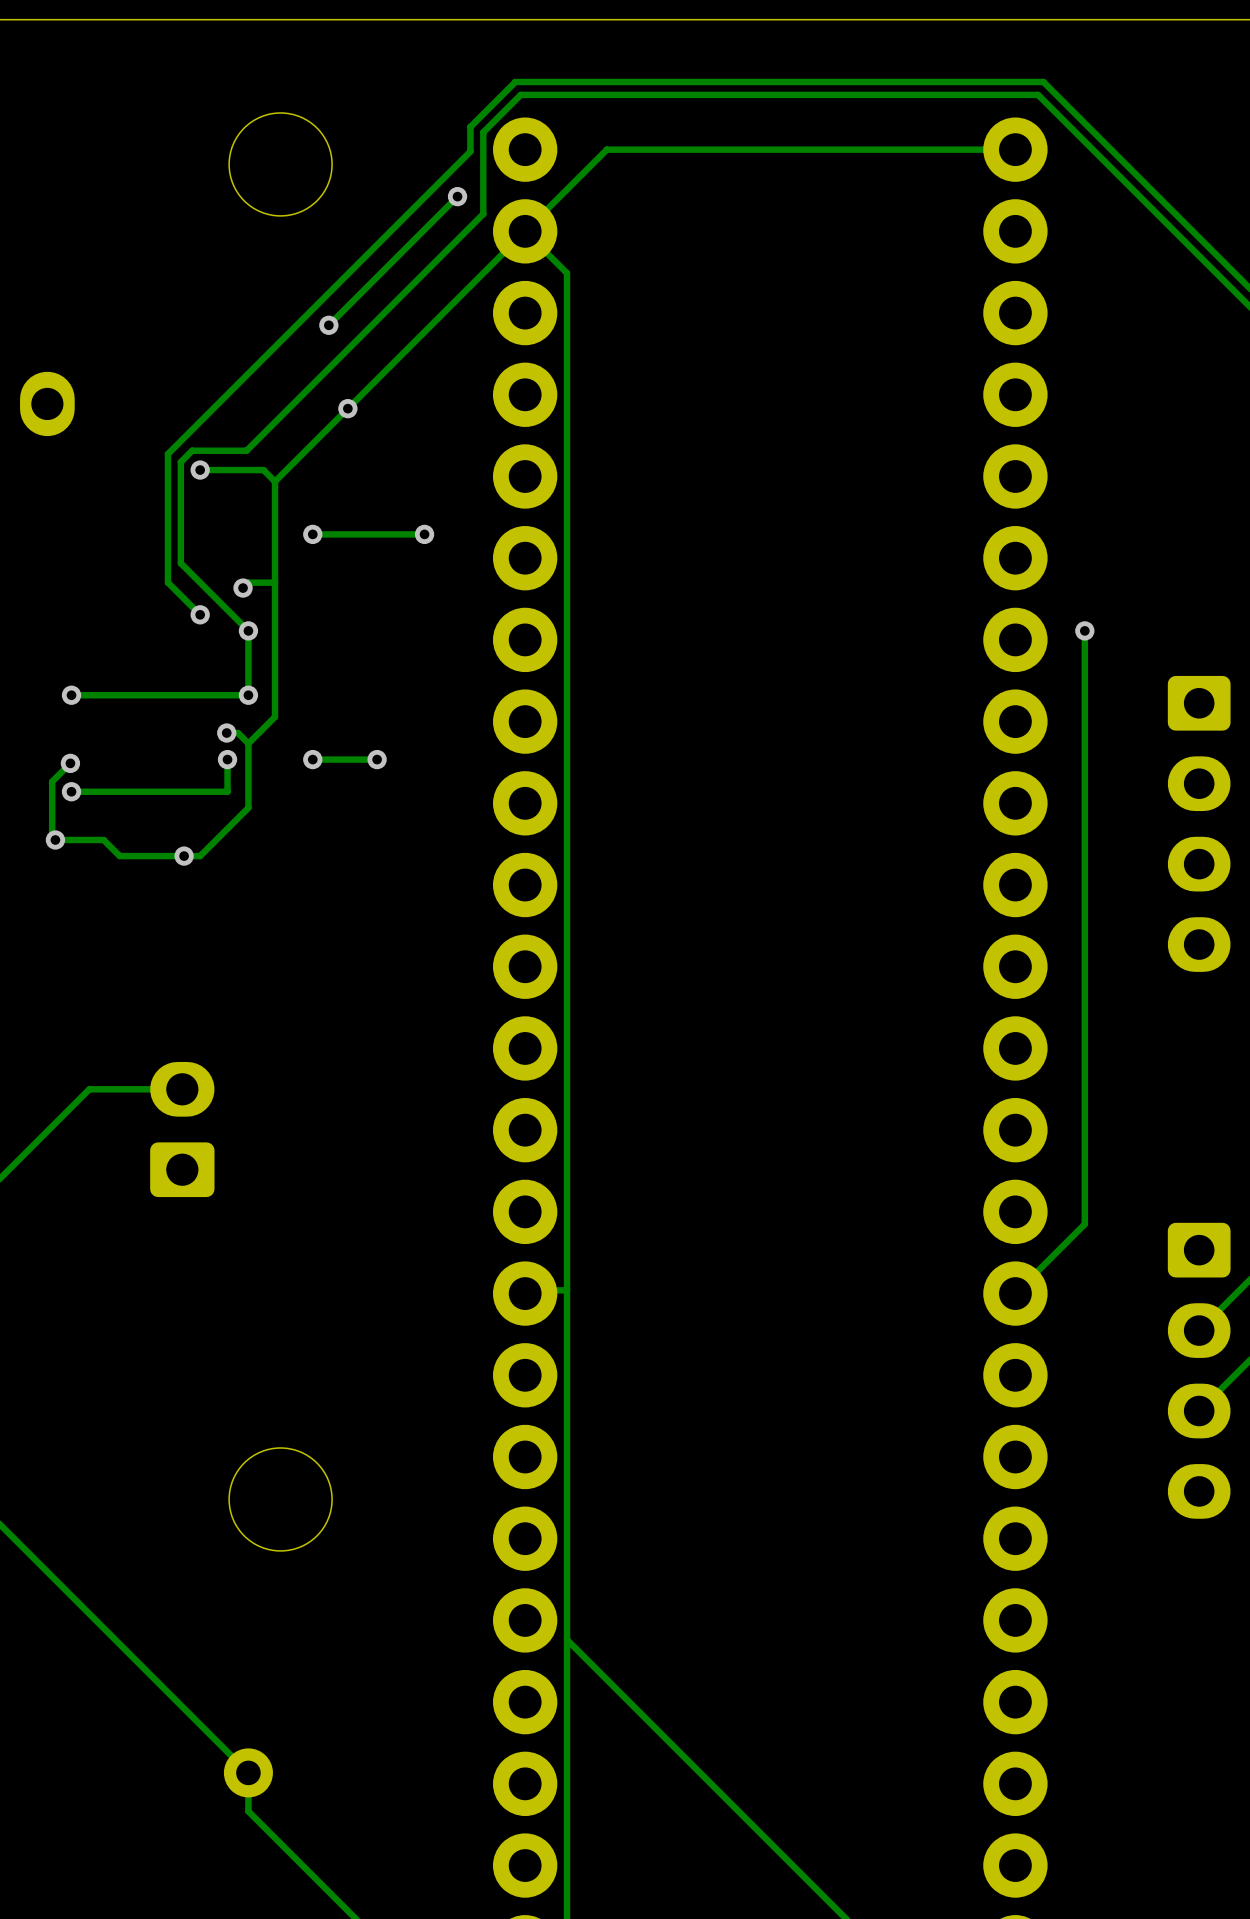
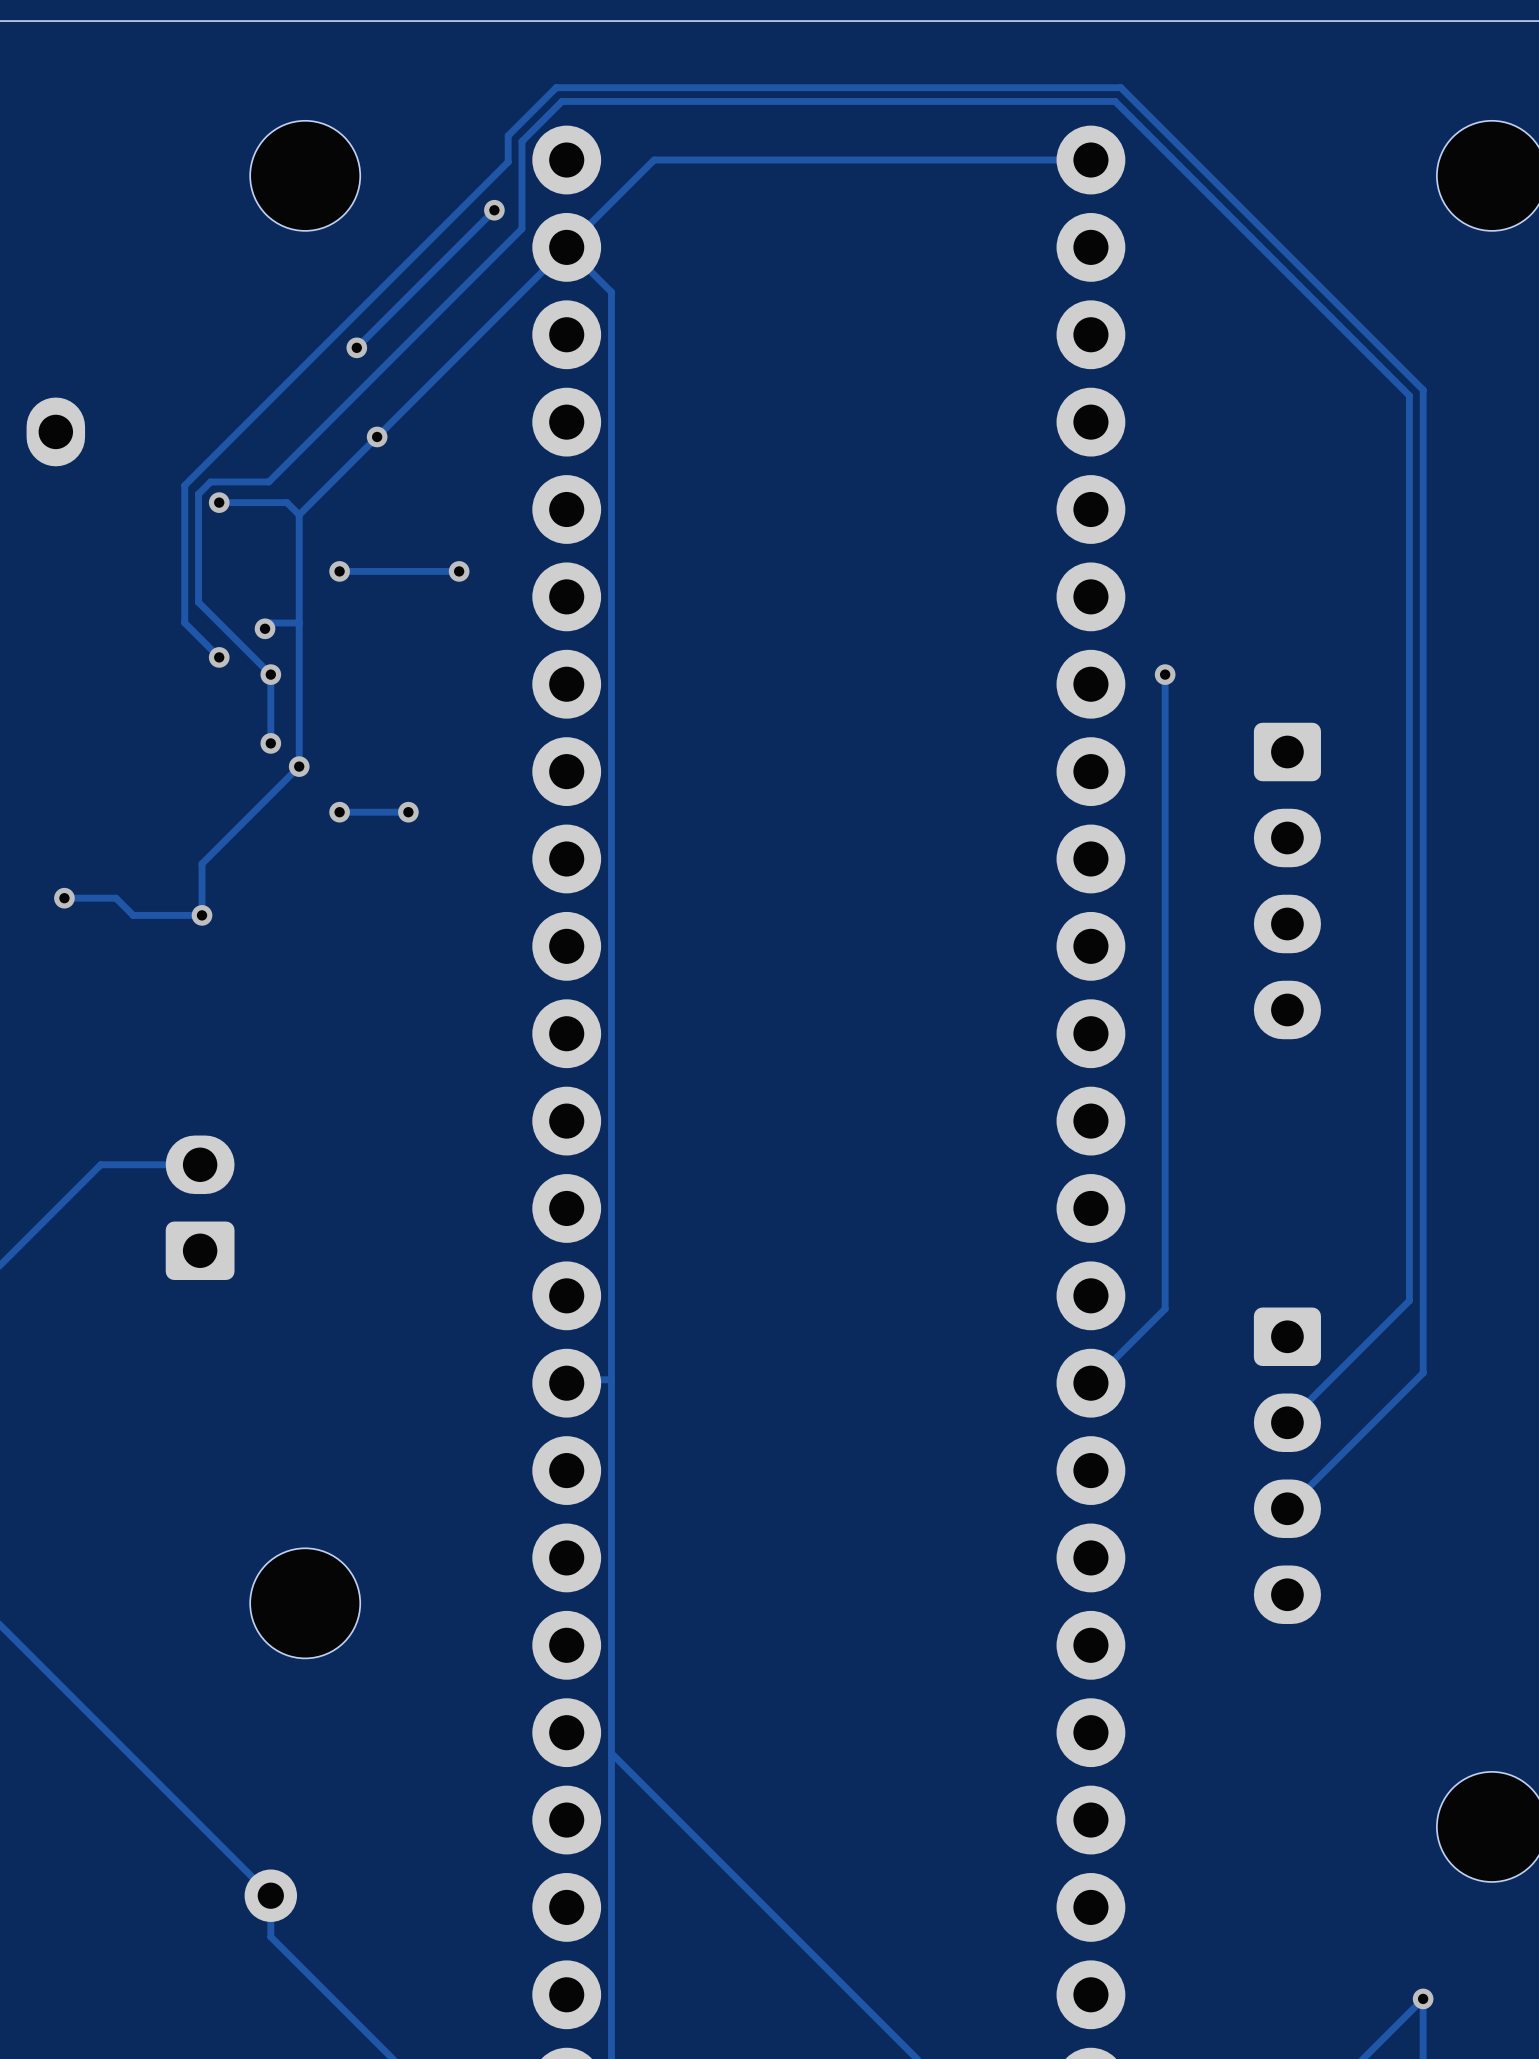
via: (71, 695) -> none
track: (248, 695) (71, 695) -> none
via: none -> (299, 766)
track: (226, 733) (237, 733) (248, 743) (248, 807) (200, 856) (184, 856) -> (270, 795) (202, 863) (202, 915)
via: (226, 733) -> none
track: (227, 759) (227, 791) (71, 791) -> none
via: (227, 759) -> none
track: (70, 763) (52, 781) (52, 836) (55, 840) -> none
via: (70, 763) -> none
via: (71, 791) -> none

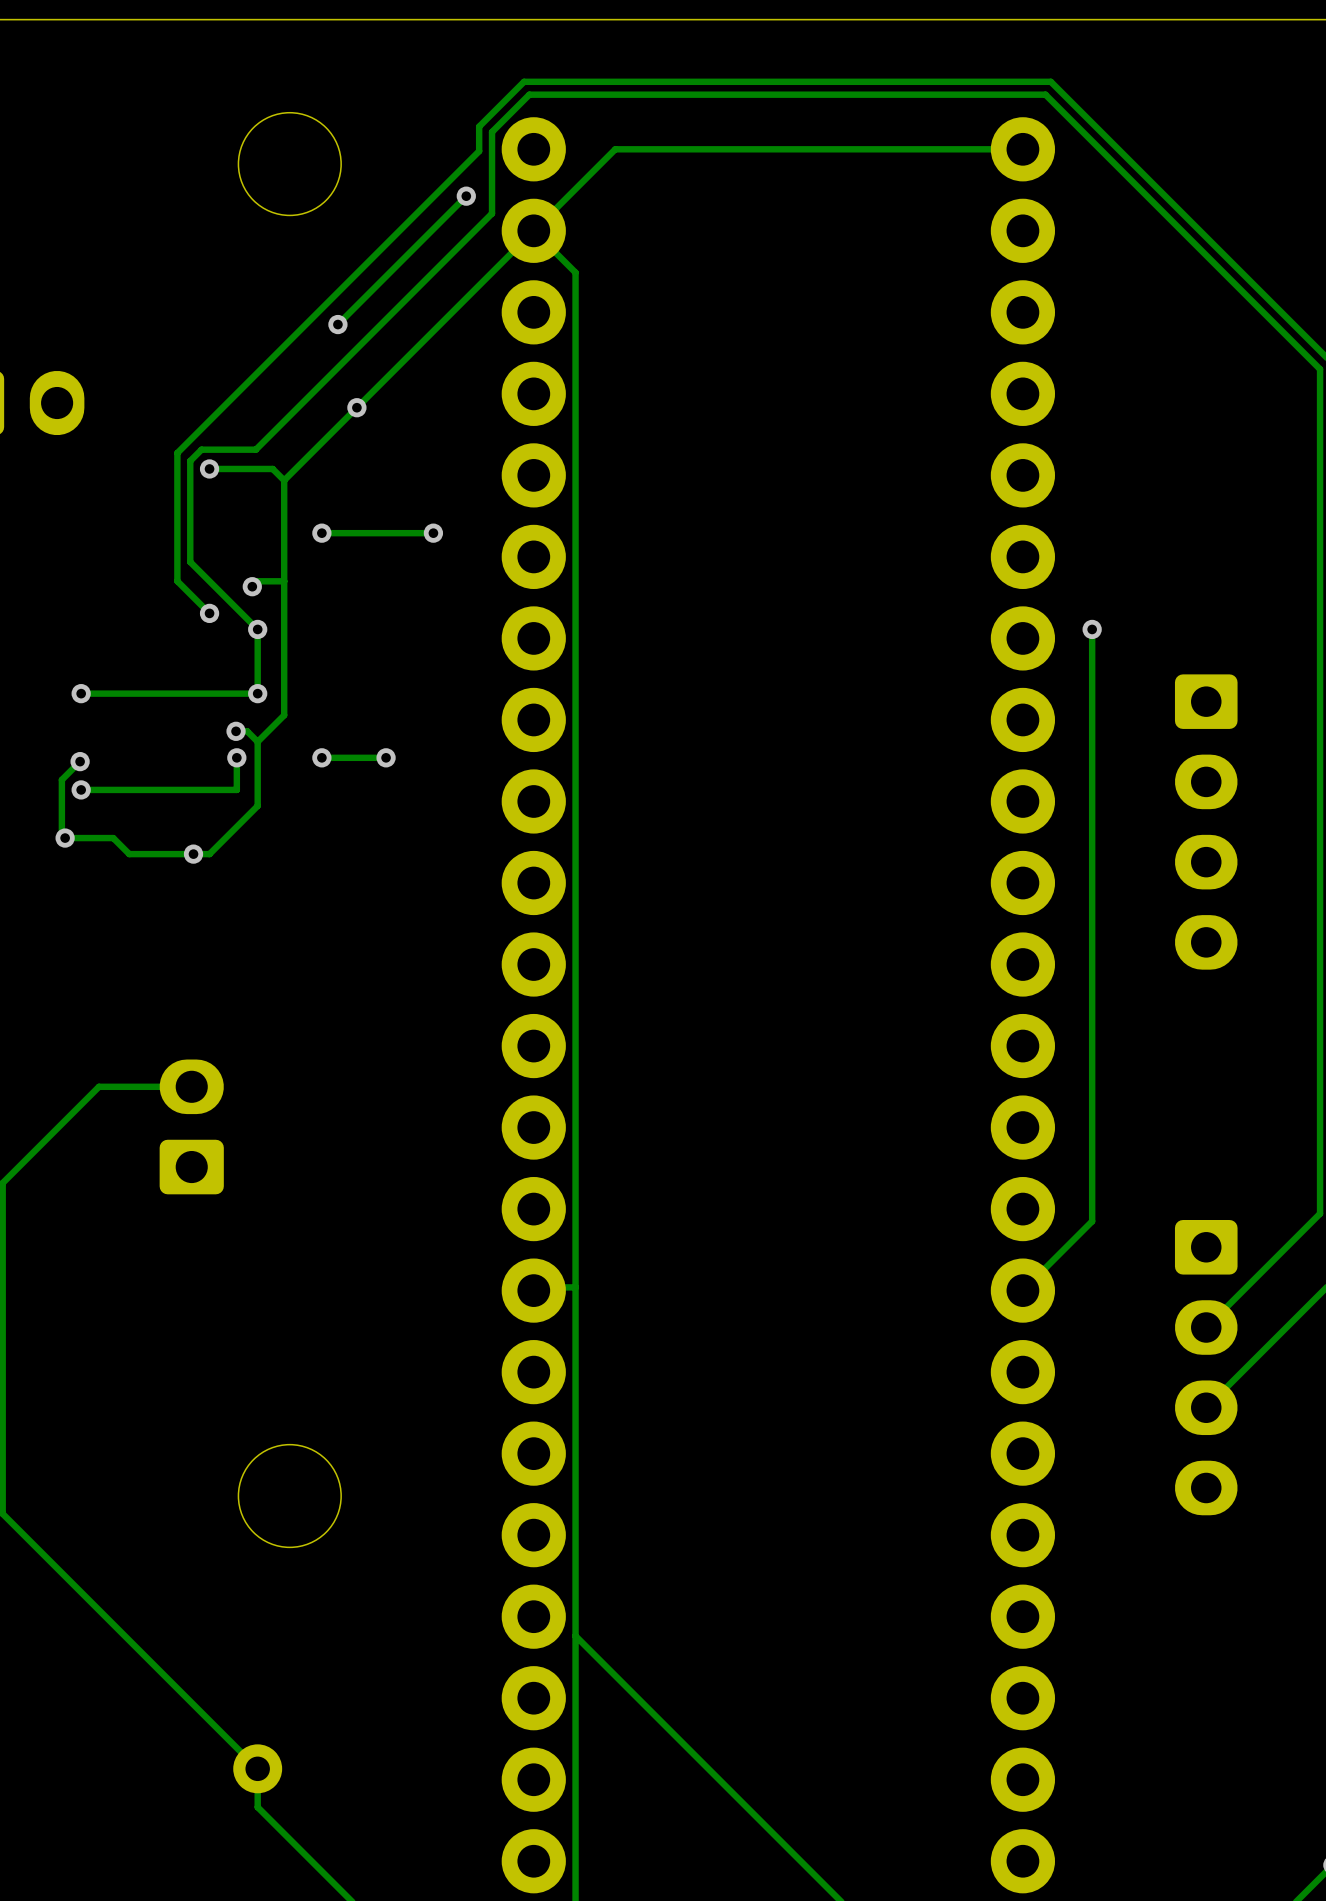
via: none -> (81, 693)
track: none -> (257, 693) (81, 693)
via: (299, 766) -> none
via: none -> (236, 731)
track: (270, 795) (202, 863) (202, 915) -> (236, 731) (247, 731) (257, 741) (257, 805) (209, 854) (193, 854)
track: none -> (236, 757) (236, 789) (81, 789)
via: none -> (236, 757)
track: none -> (80, 761) (61, 779) (61, 834) (65, 838)
via: none -> (80, 761)
via: none -> (81, 789)

